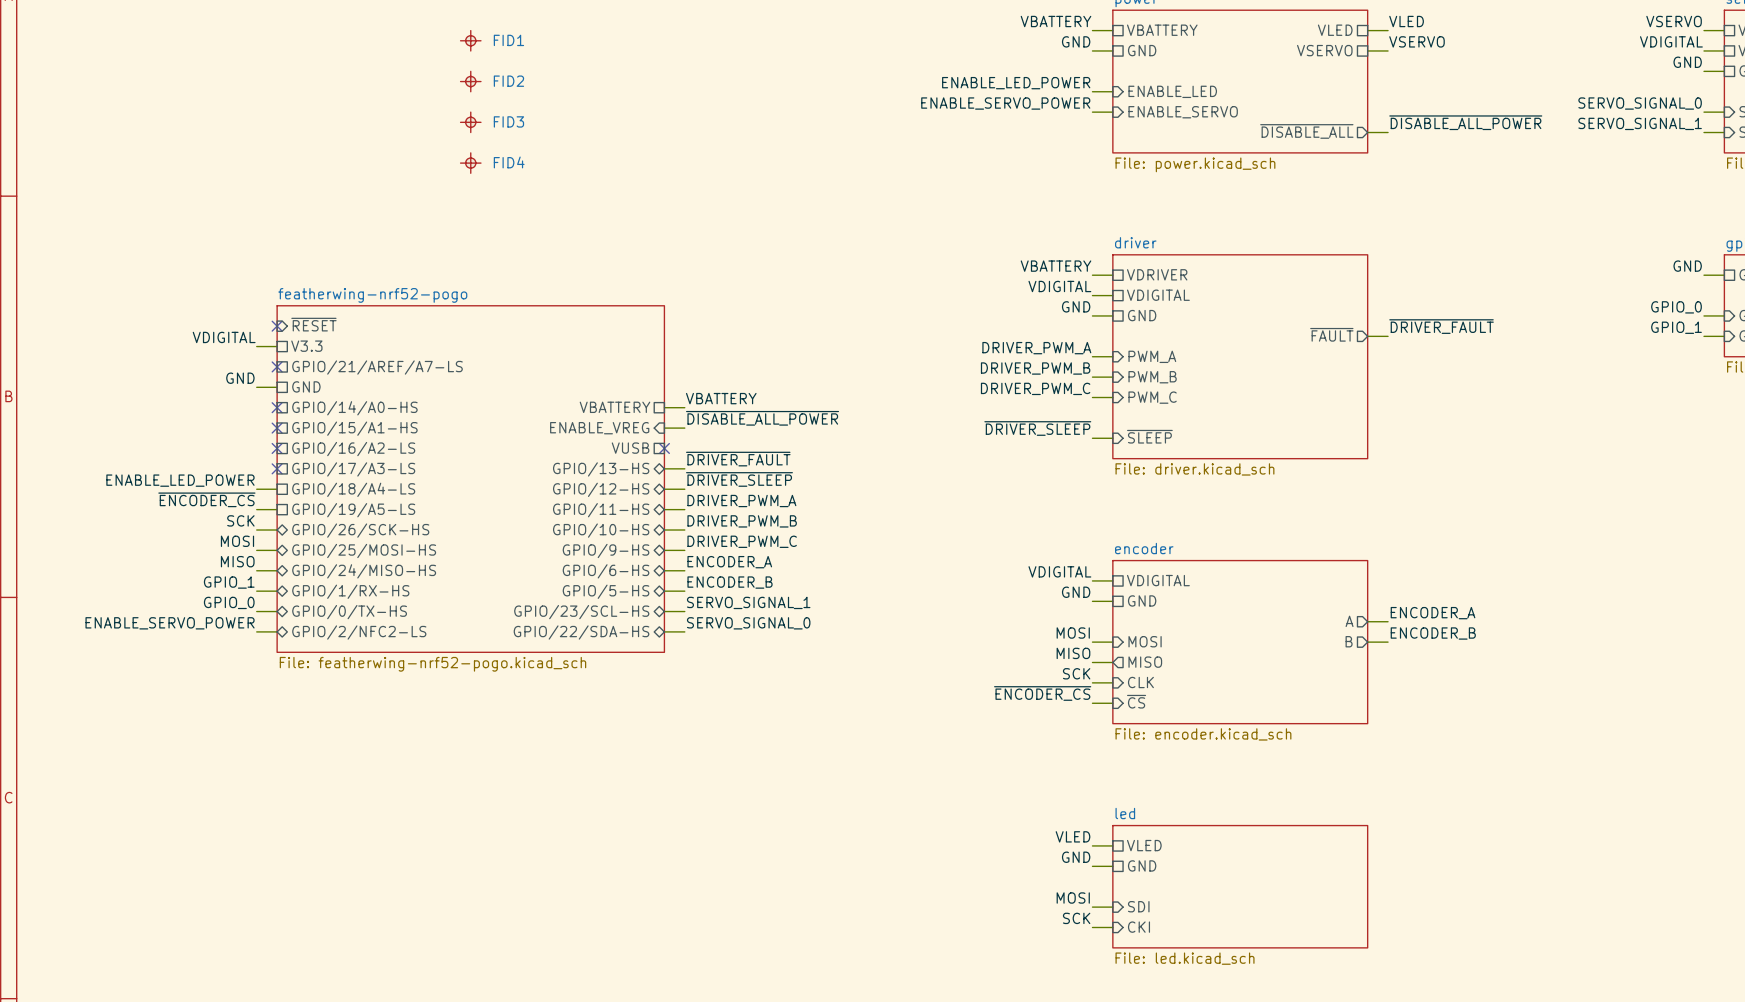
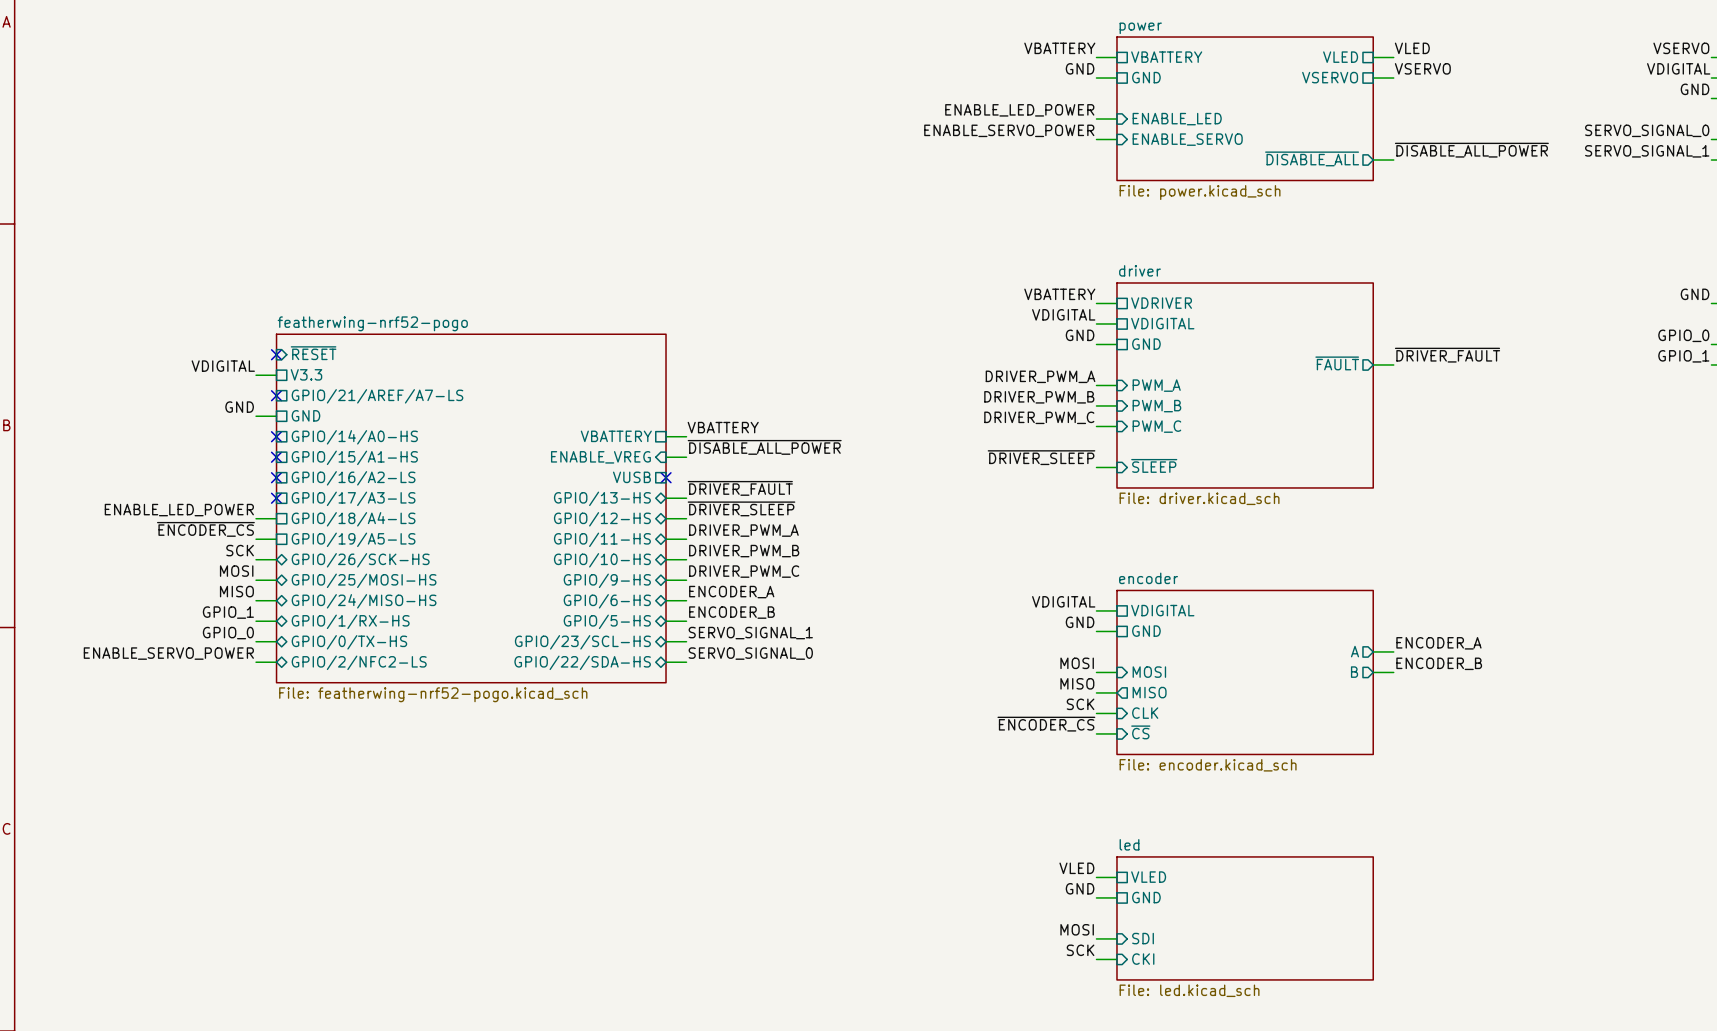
FID1: (470, 40) -> none
FID2: (470, 81) -> none
FID3: (470, 122) -> none
FID4: (470, 163) -> none

